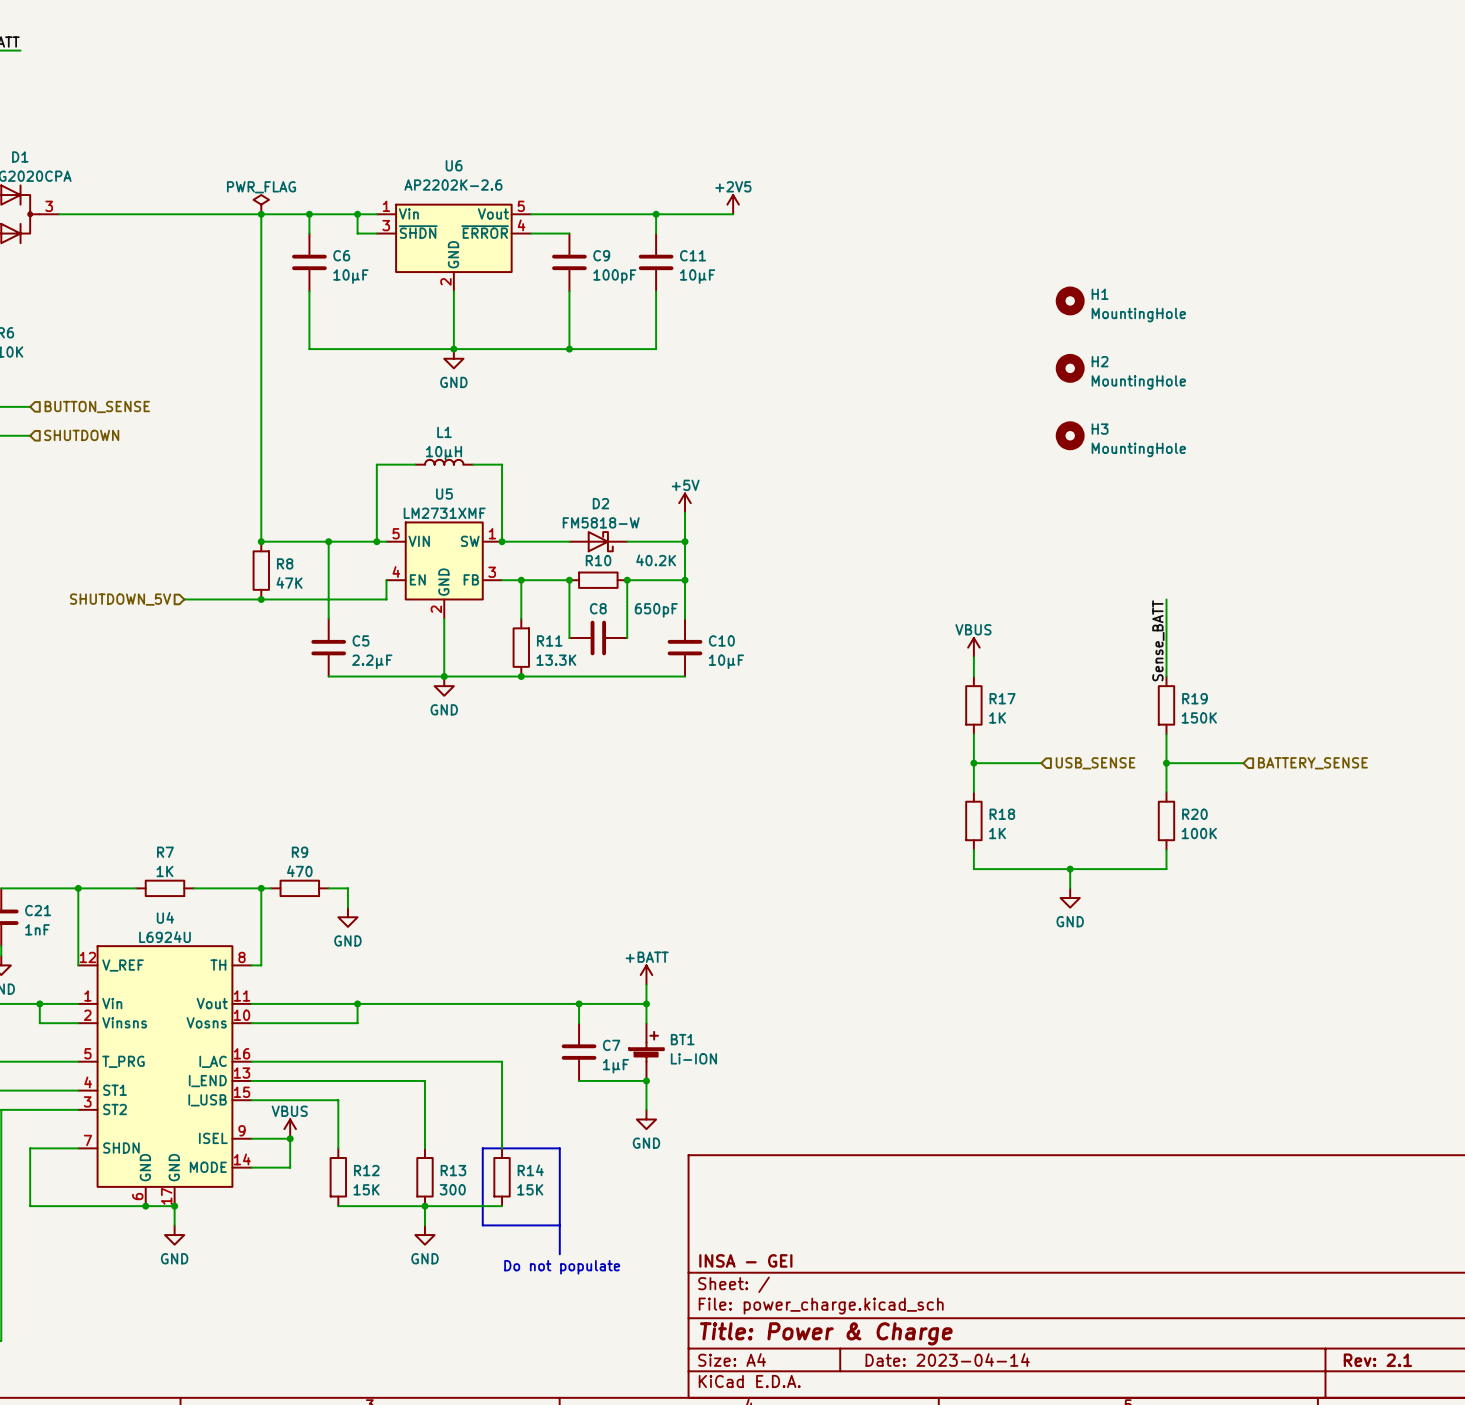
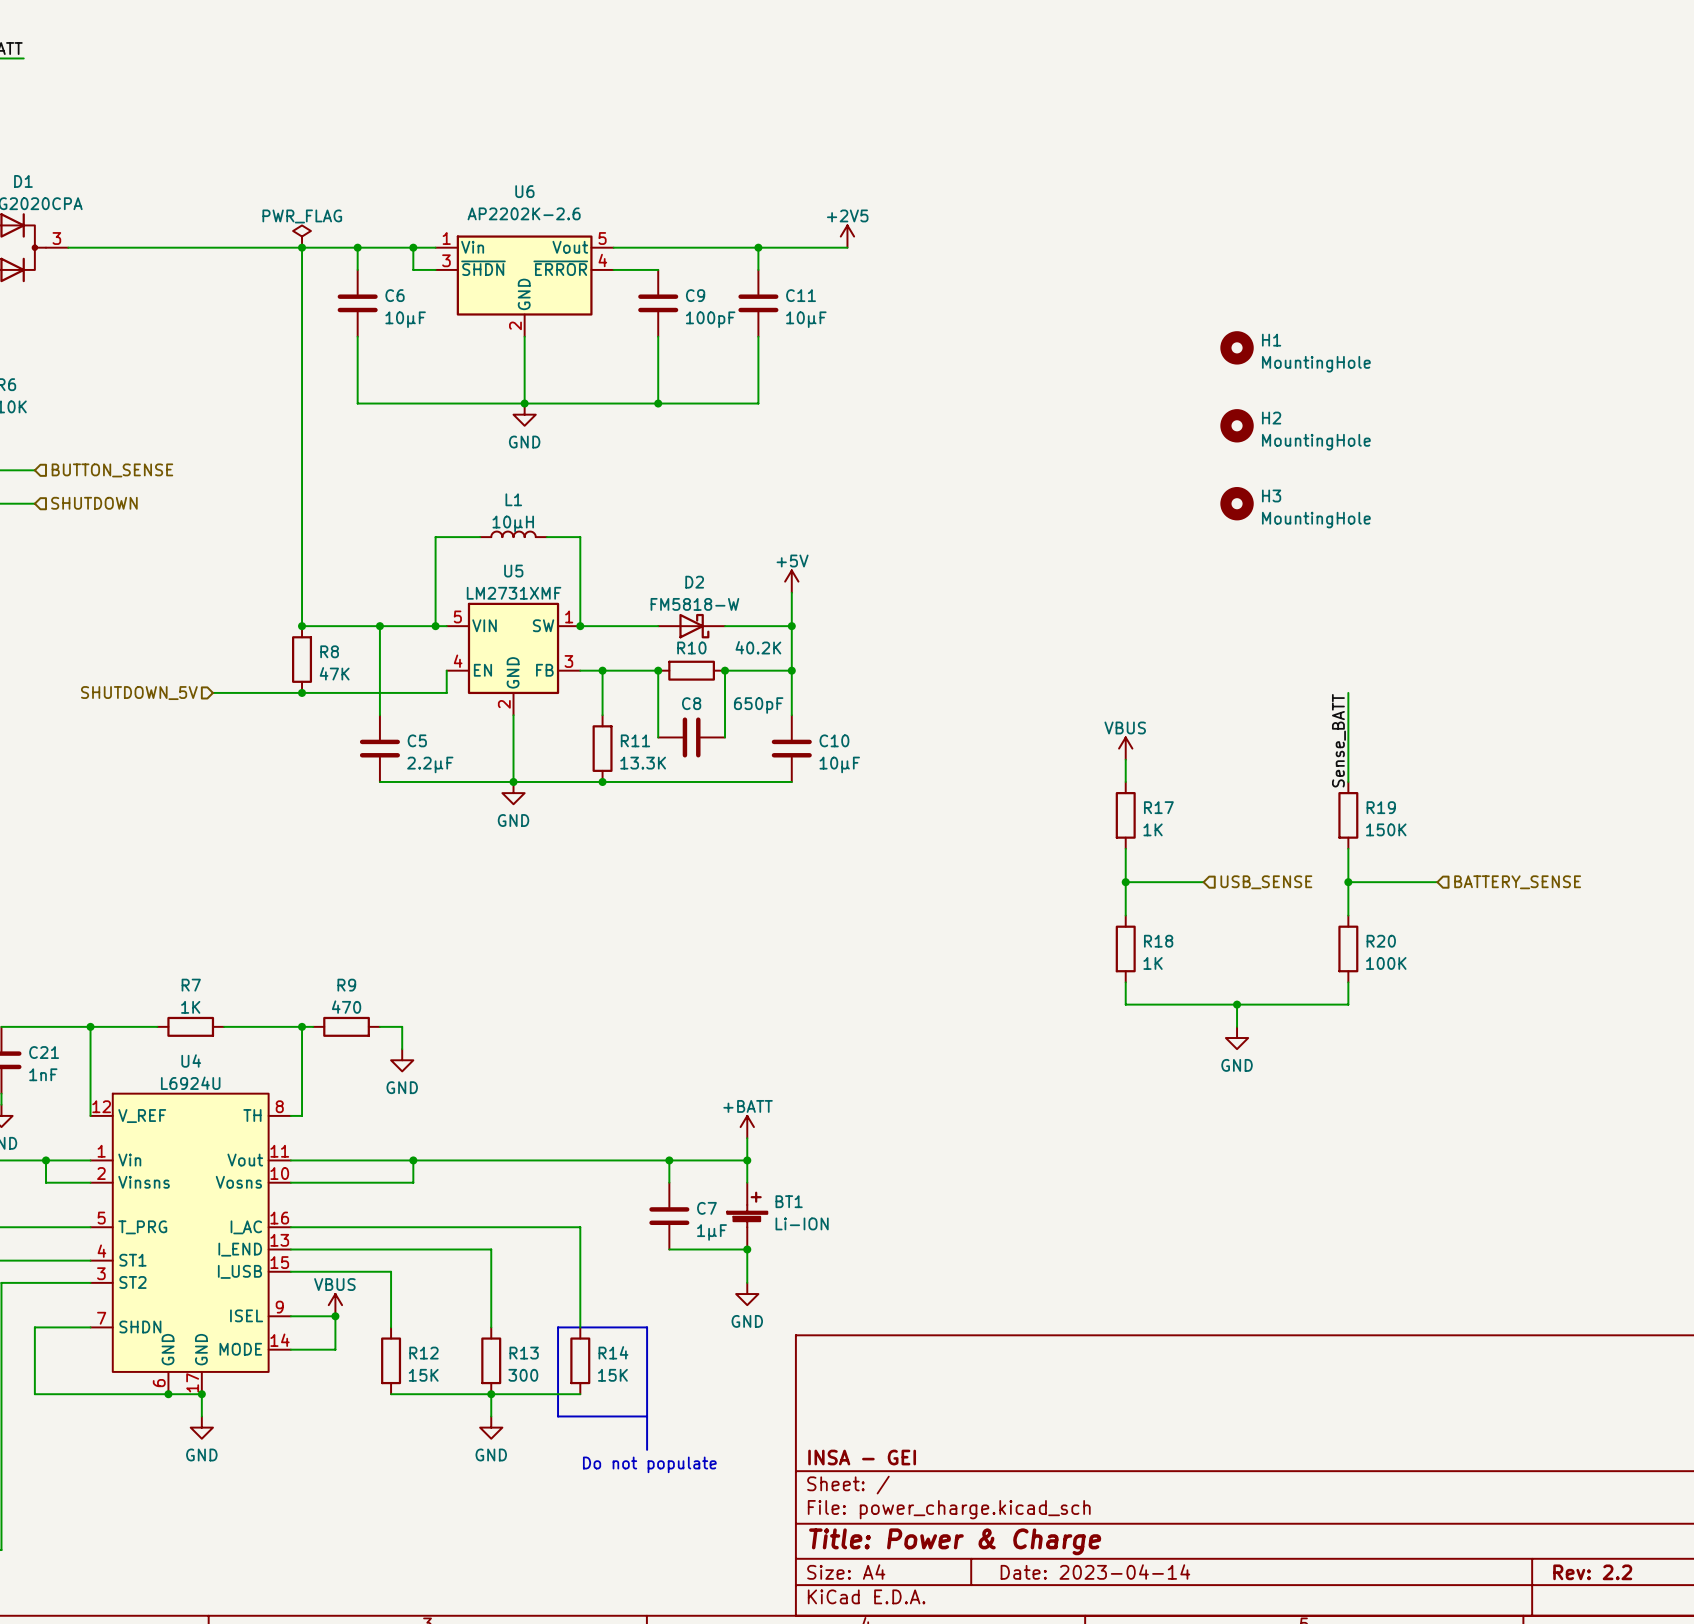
title block: Rev: 2.1 (1377, 1360) -> Rev: 2.2 (1592, 1572)

